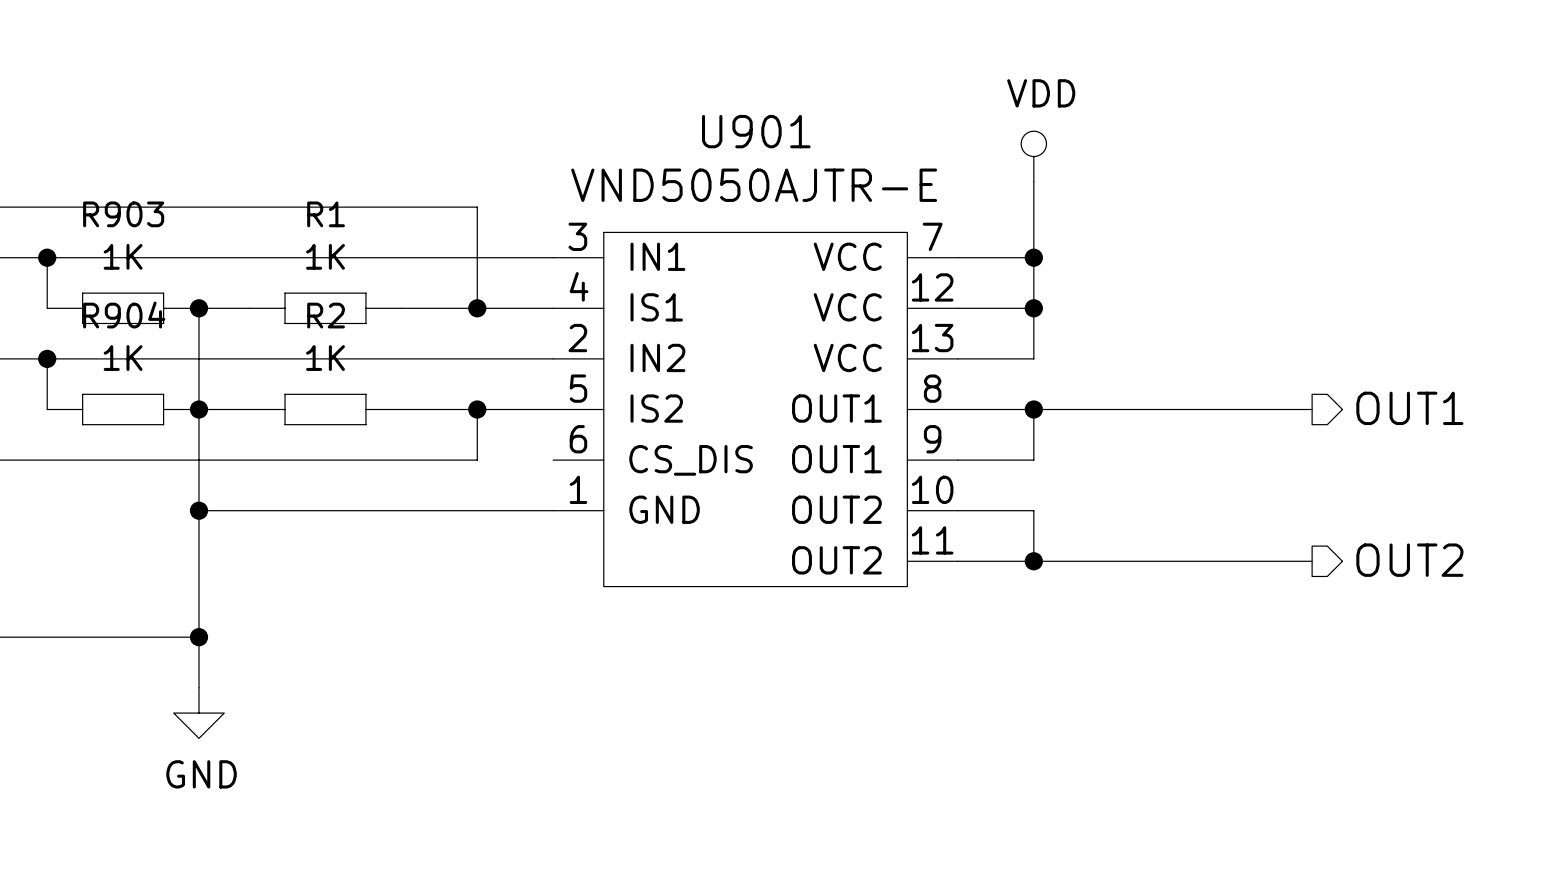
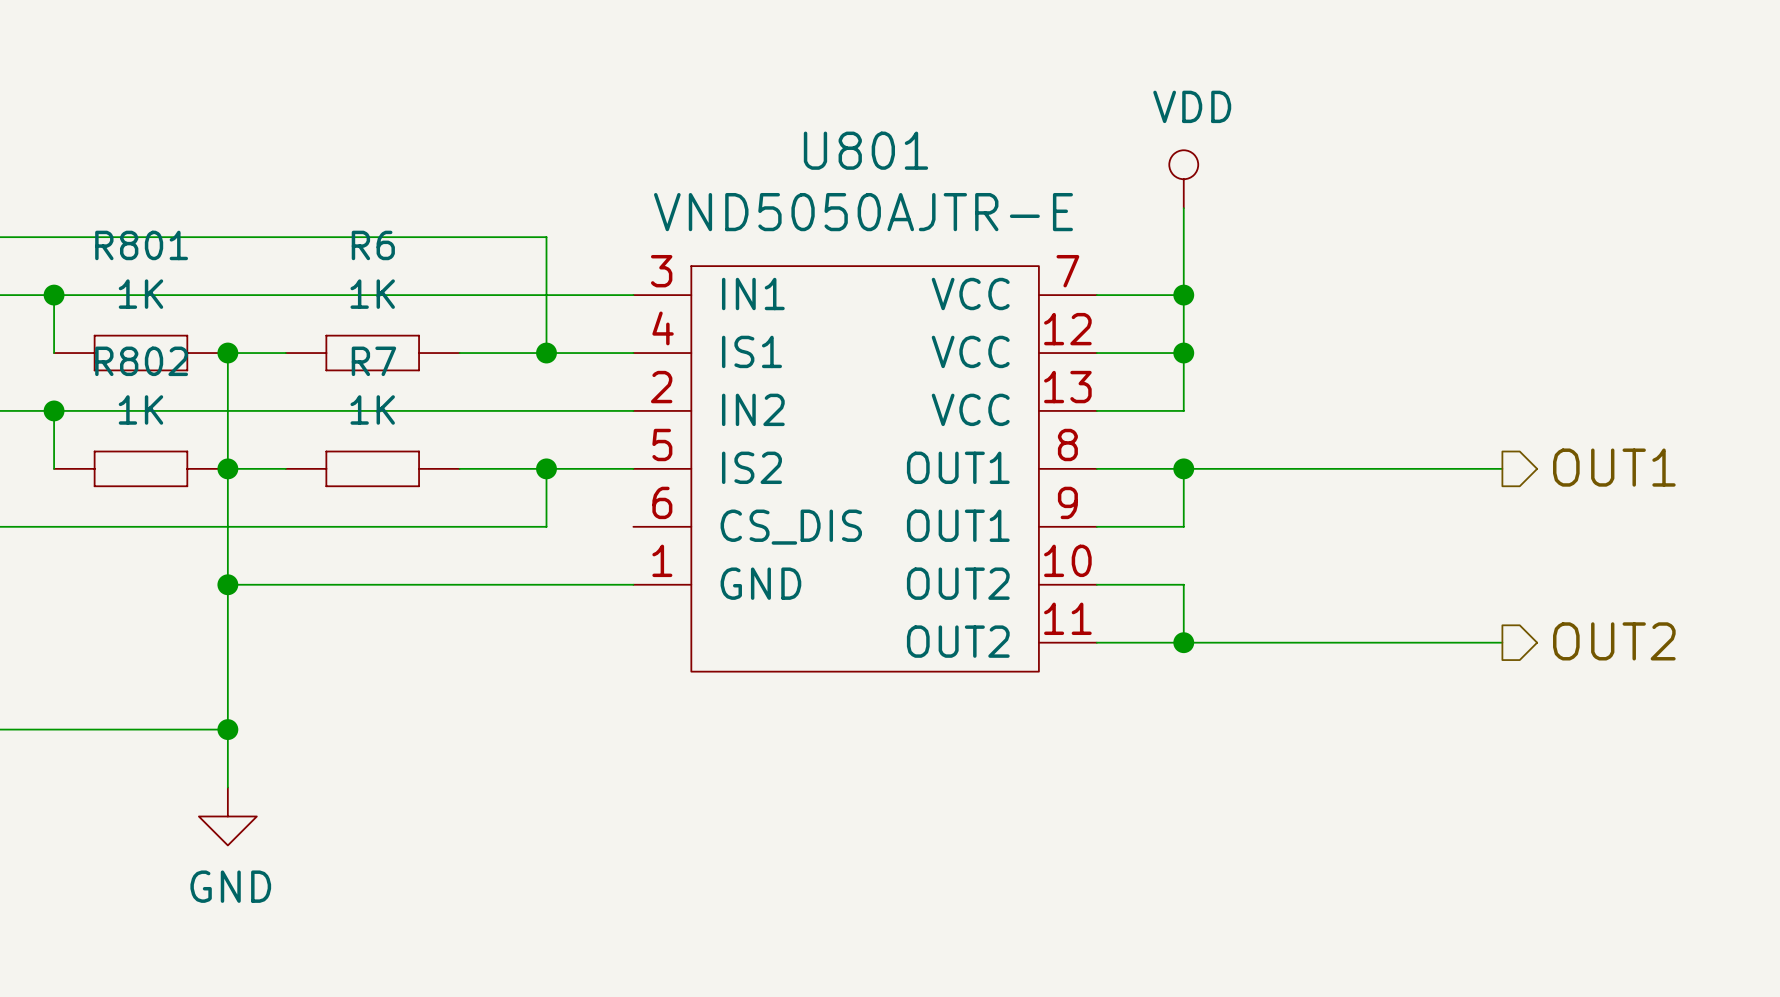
U901 name: U901 (756, 131) -> U801 (865, 150)
R903 name: R903 (123, 214) -> R801 (141, 245)
R1 name: R1 (326, 214) -> R6 (373, 245)
R904 name: R904 (124, 315) -> R802 (141, 361)
R2 name: R2 (326, 315) -> R7 (373, 361)

